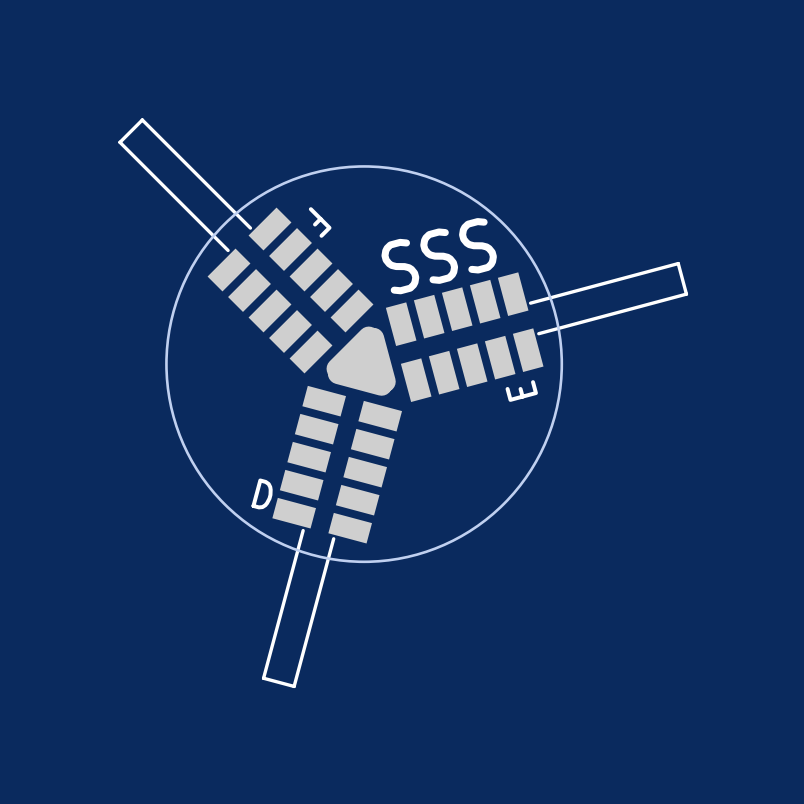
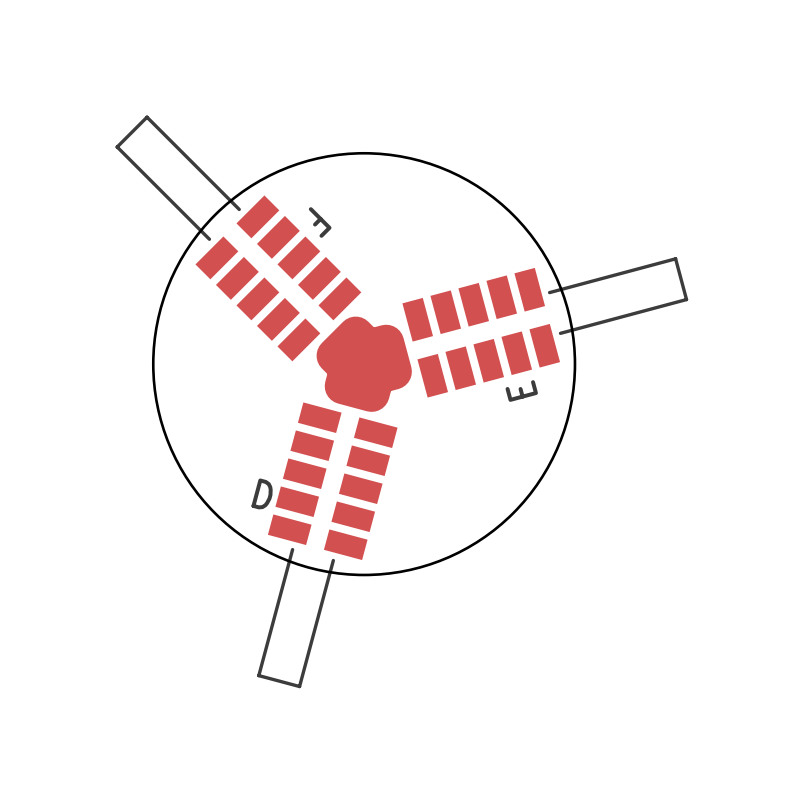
part footprint: [118, 118, 384, 384] -> [115, 115, 380, 380]
round board edge size: [165, 165, 564, 564] -> [151, 151, 577, 577]
text: SSS (439, 256) -> none
part footprint: [357, 261, 689, 403] -> [359, 257, 689, 398]
part footprint: [261, 357, 403, 689] -> [257, 359, 398, 689]

